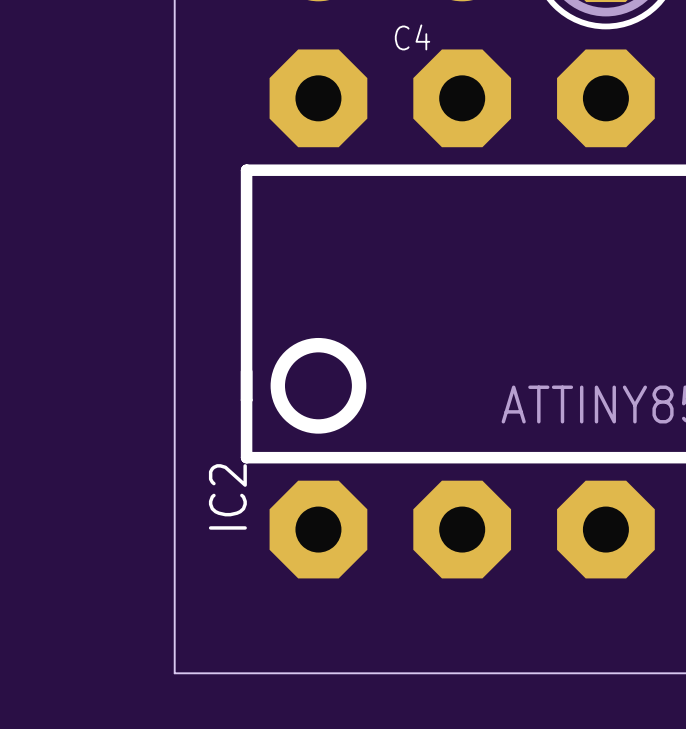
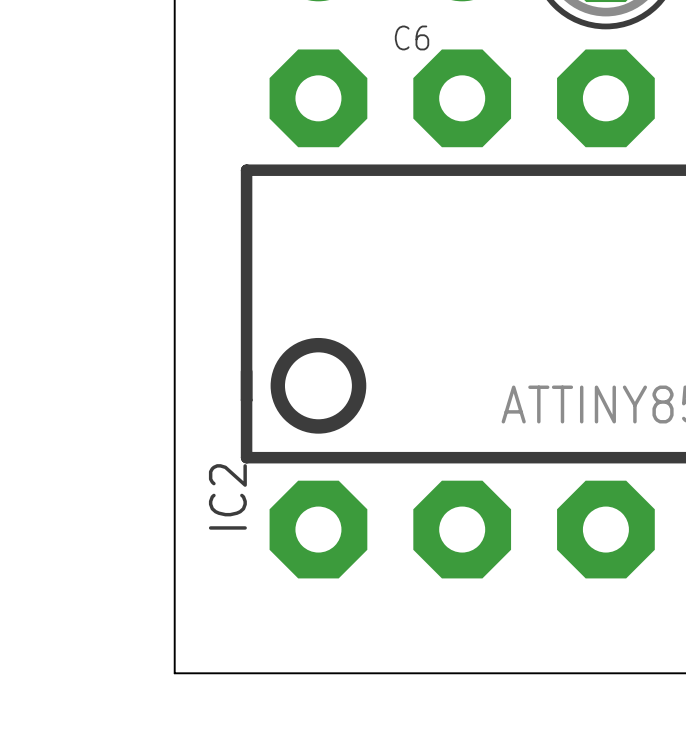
C4 name: C4 (412, 37) -> C6 (412, 37)

